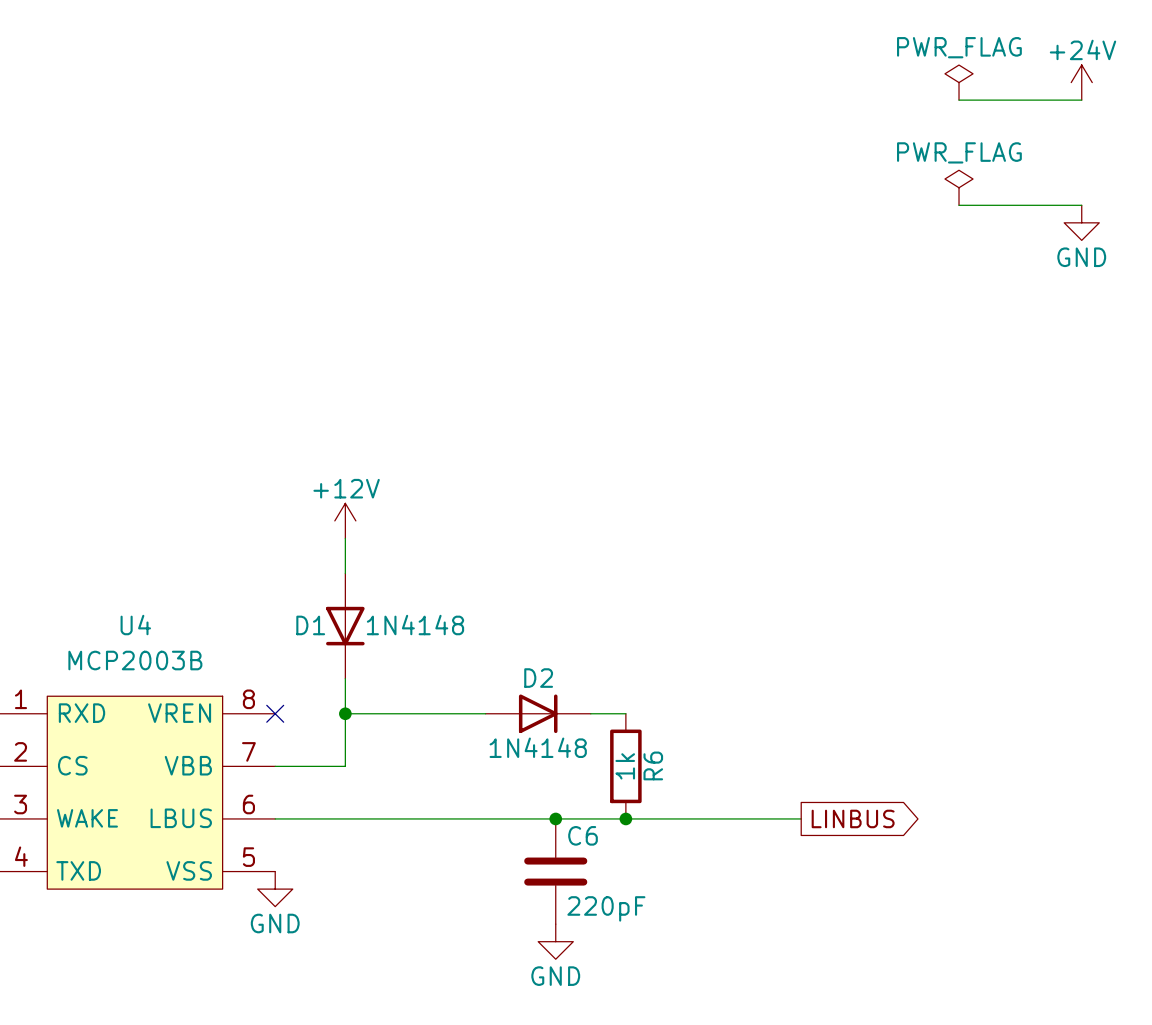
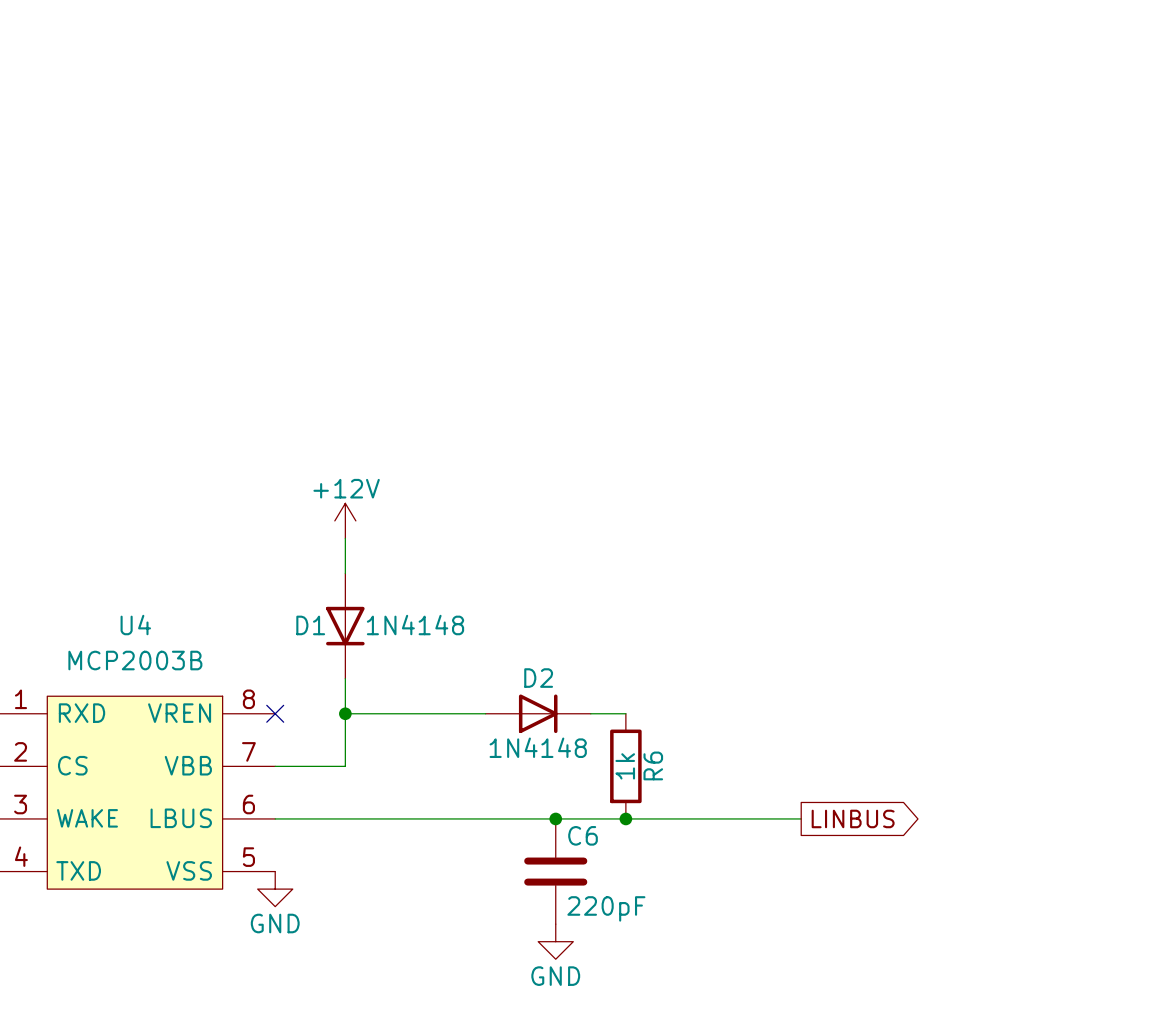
power symbol: PWR_FLAG (959, 82) -> none
power symbol: +24V (1081, 82) -> none
wire: (959, 100) (1081, 100) -> none
power symbol: PWR_FLAG (959, 187) -> none
wire: (959, 205) (1081, 205) -> none
power symbol: GND (1081, 222) -> none

